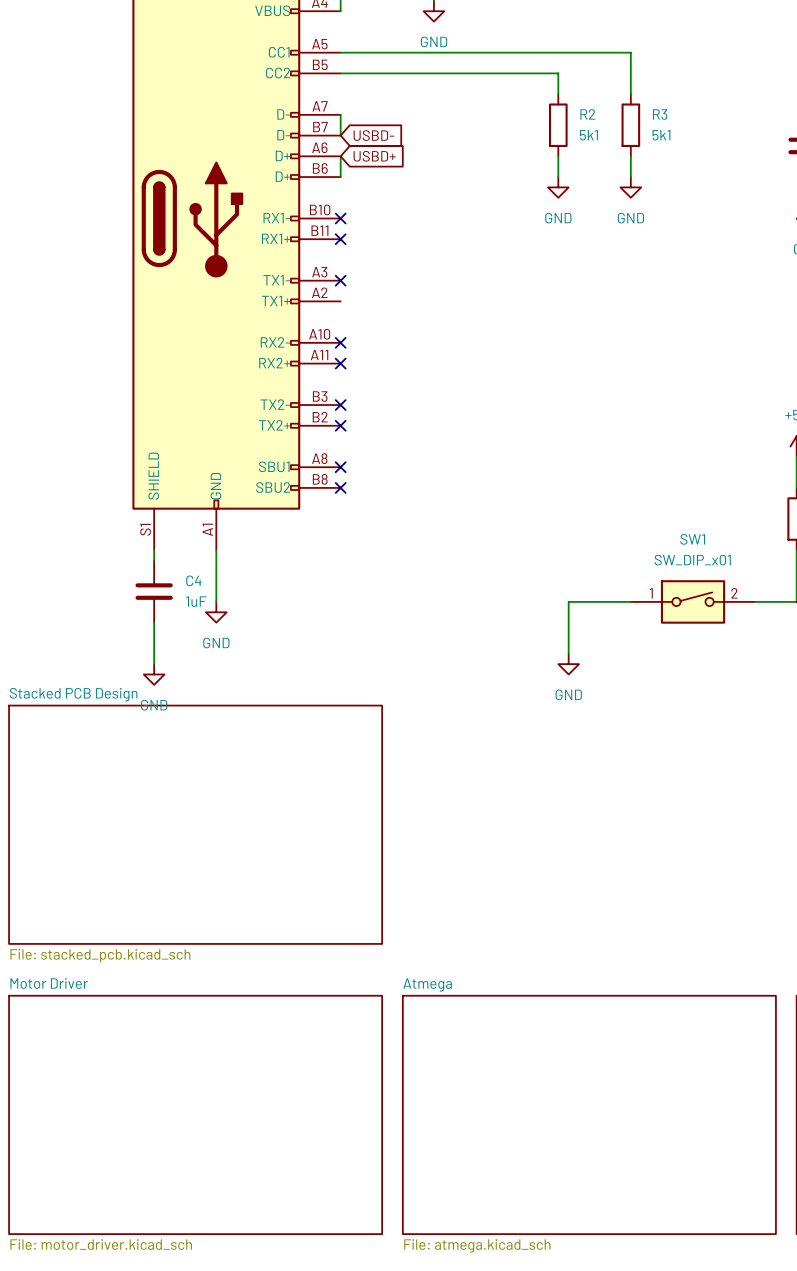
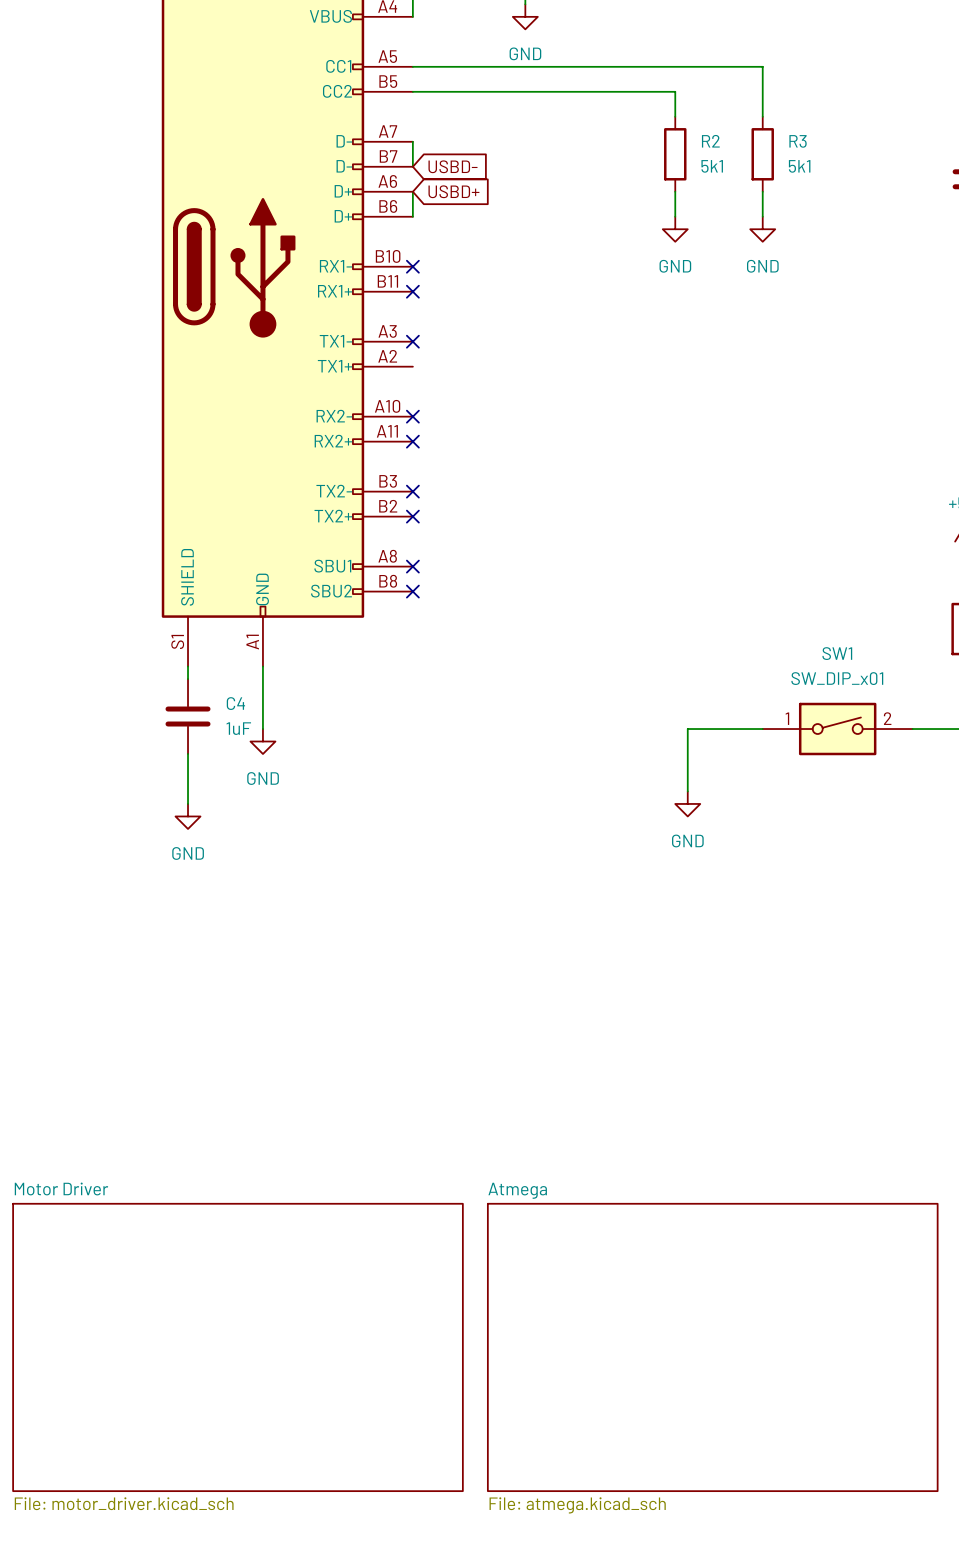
sheet Stacked PCB Design: File: stacked_pcb.kicad_sch (195, 824) -> none

